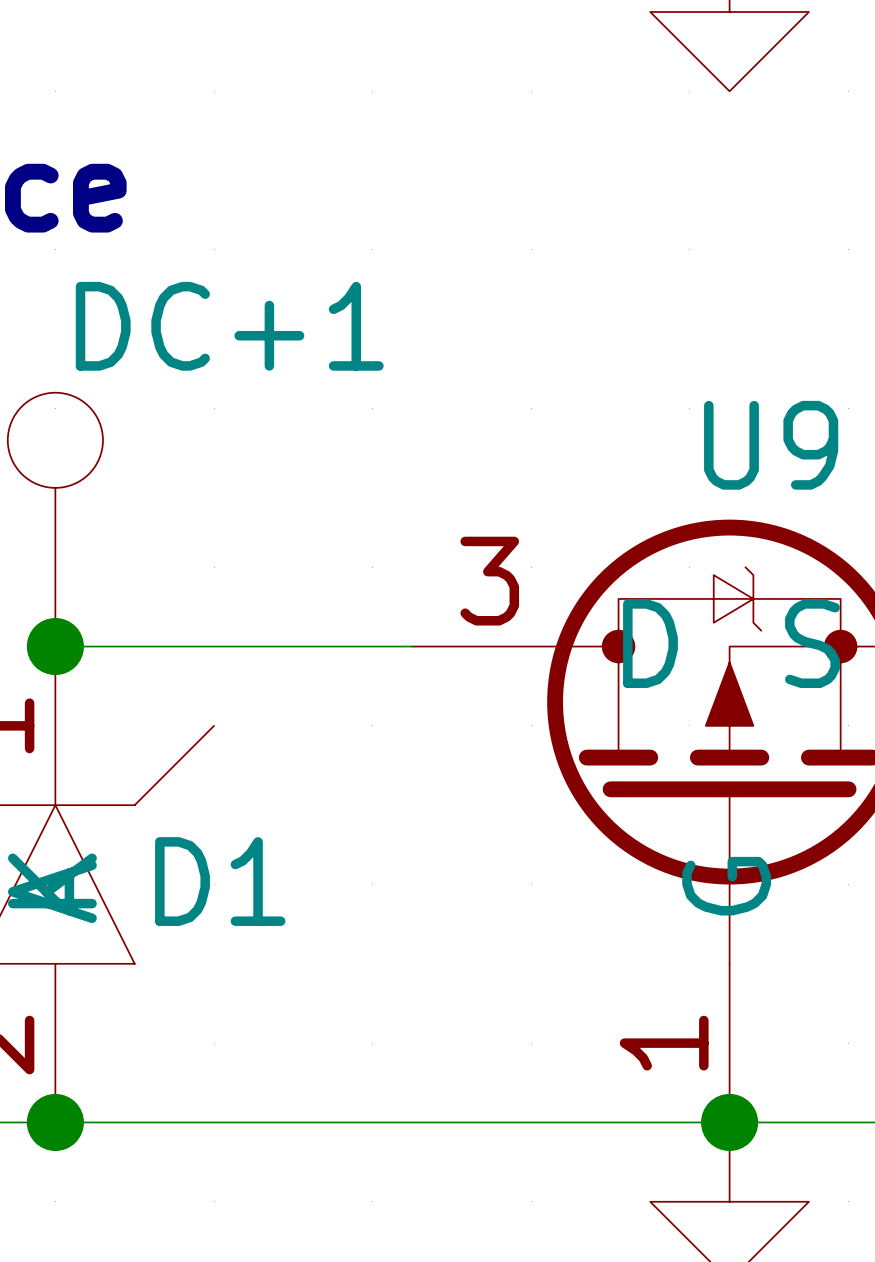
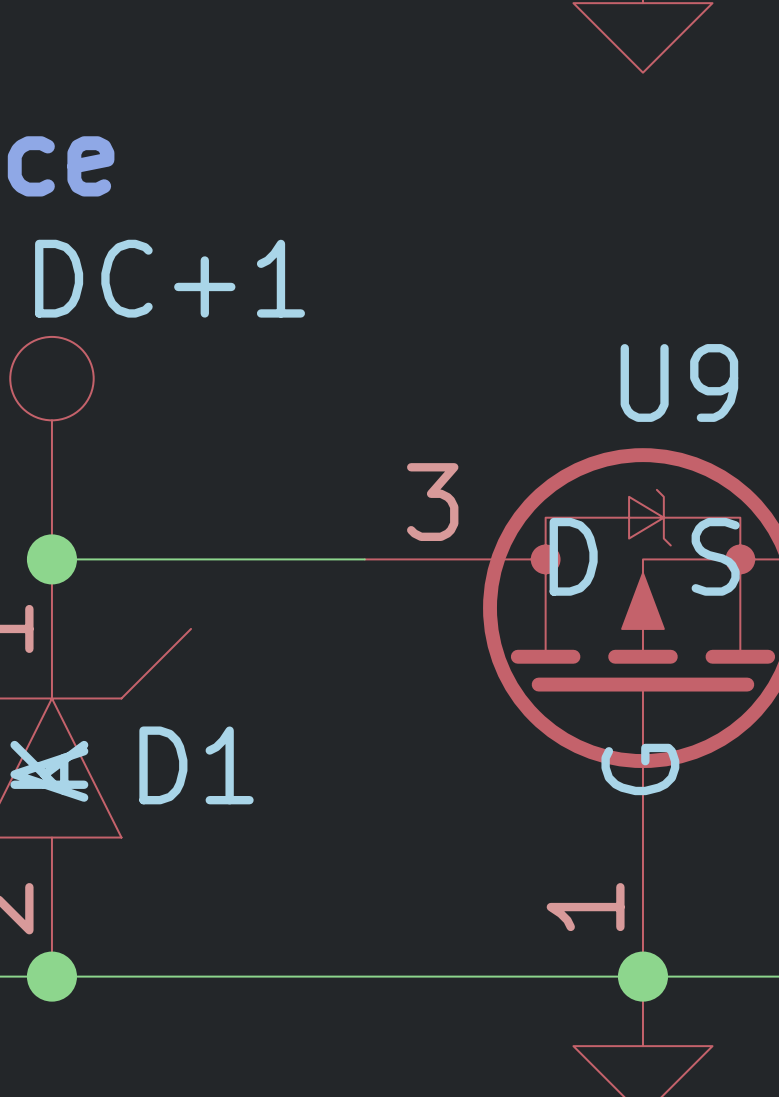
DC+1 name position: DC+1 (229, 326) -> DC+1 (170, 278)

